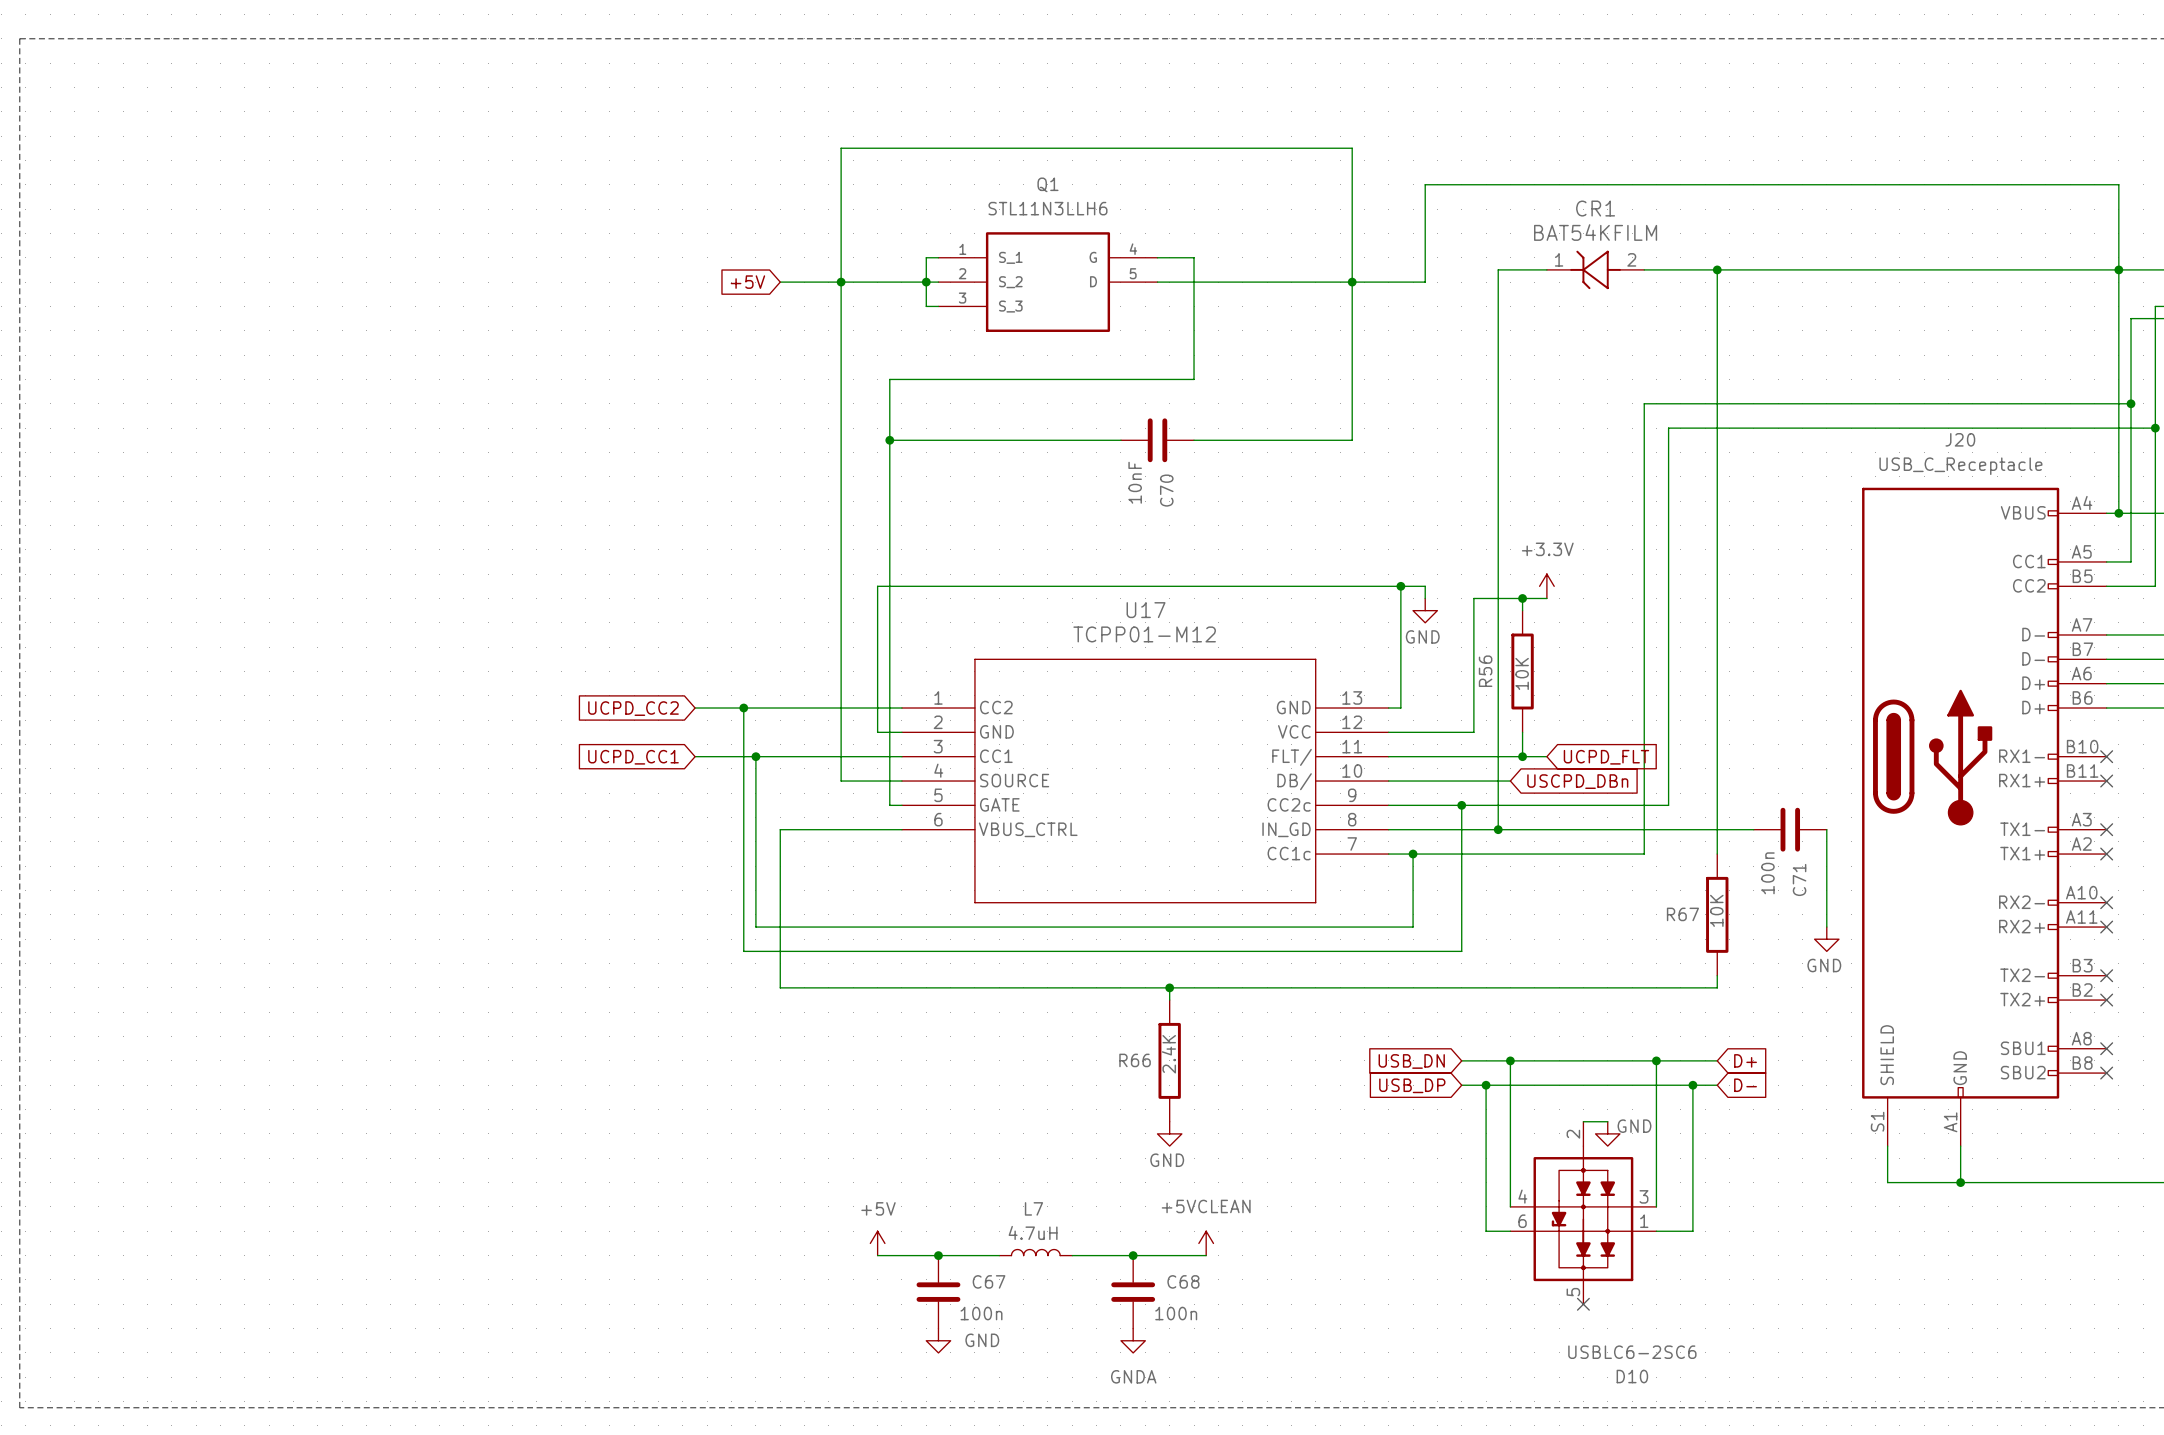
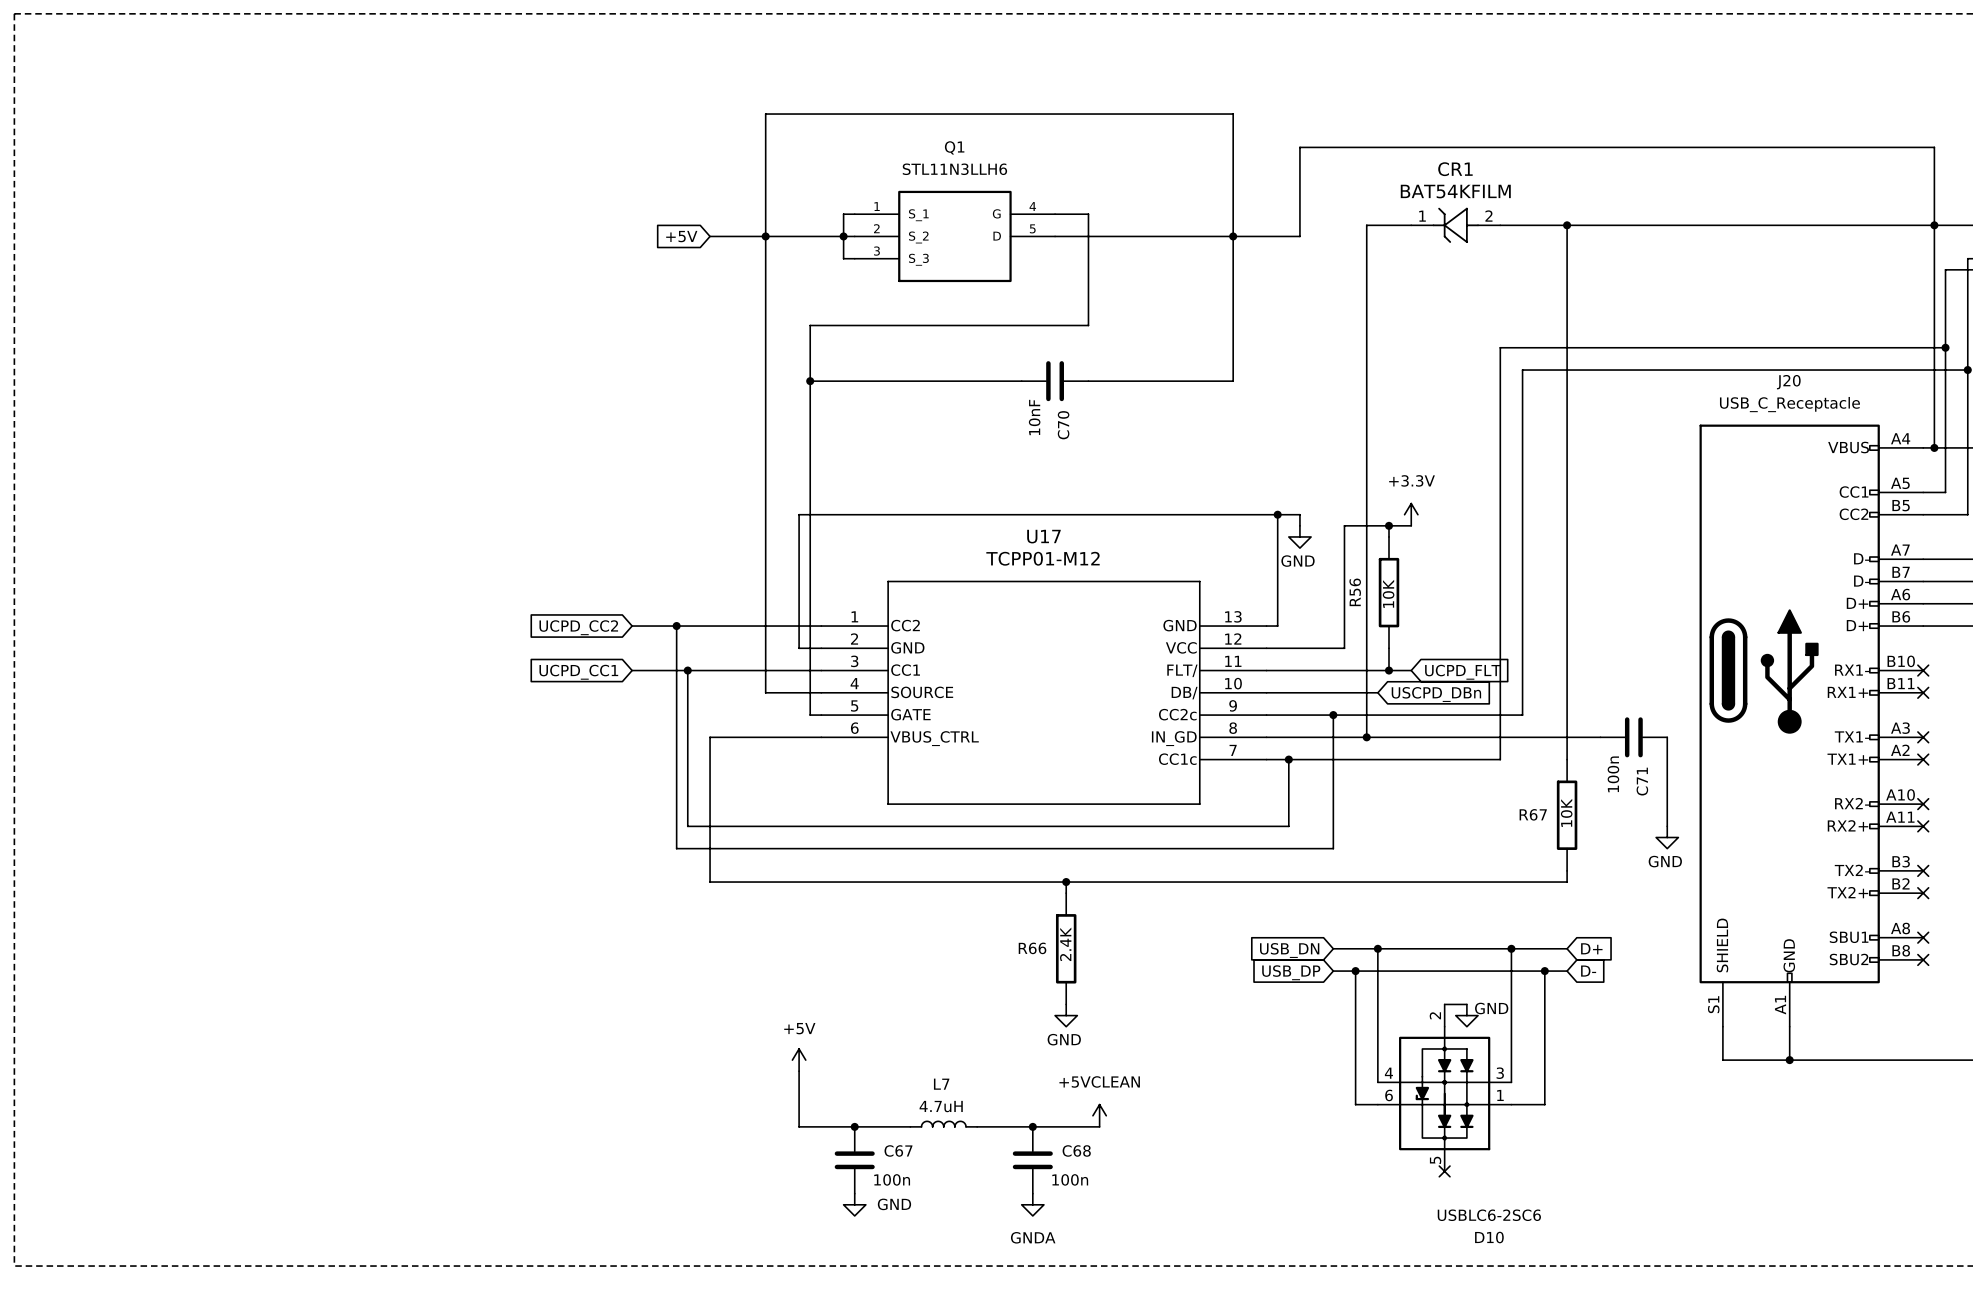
wire: none -> (799, 1071) (799, 1126)
power symbol position: +5V (877, 1243) -> +5V (799, 1060)

